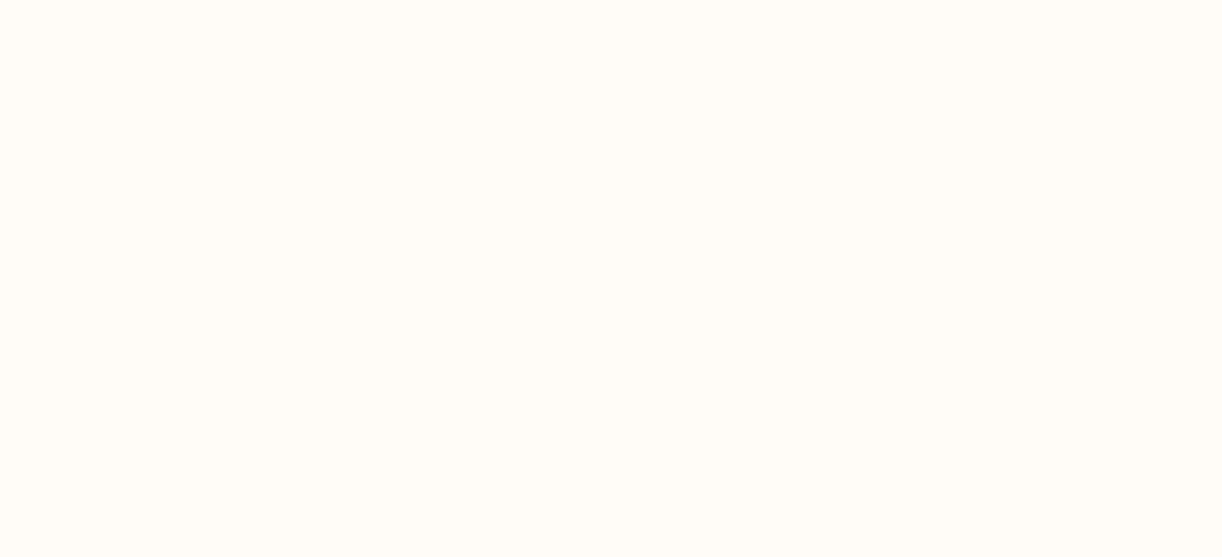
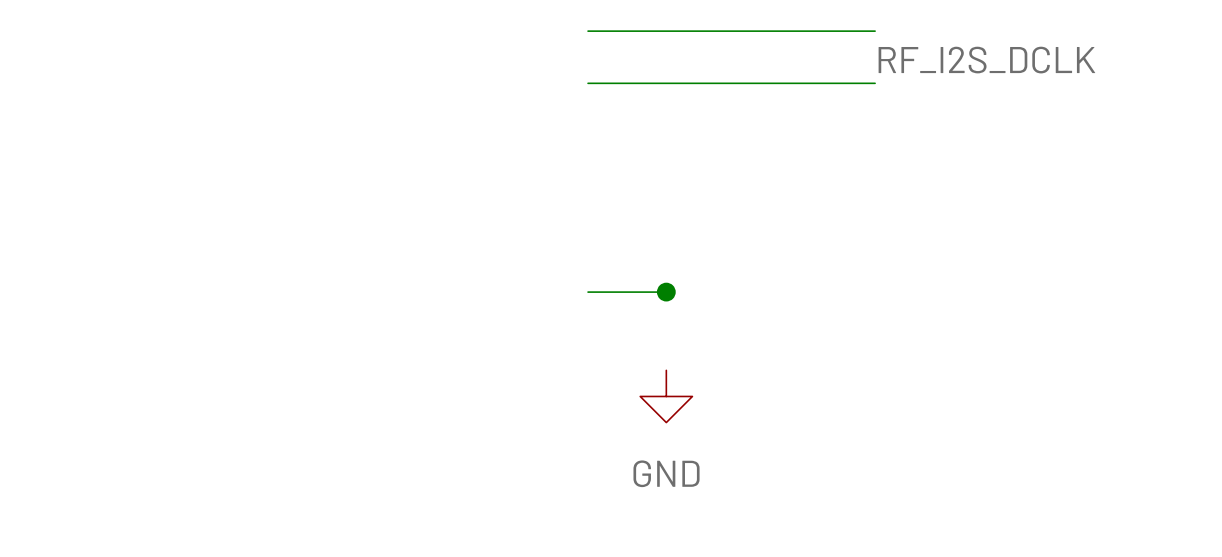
wire: none -> (588, 31) (875, 31)
label: none -> RF_I2S_DCLK (986, 60)
wire: none -> (588, 83) (875, 83)
wire: none -> (588, 292) (666, 292)
junction: none -> (666, 292)
power symbol: none -> GND (666, 396)

